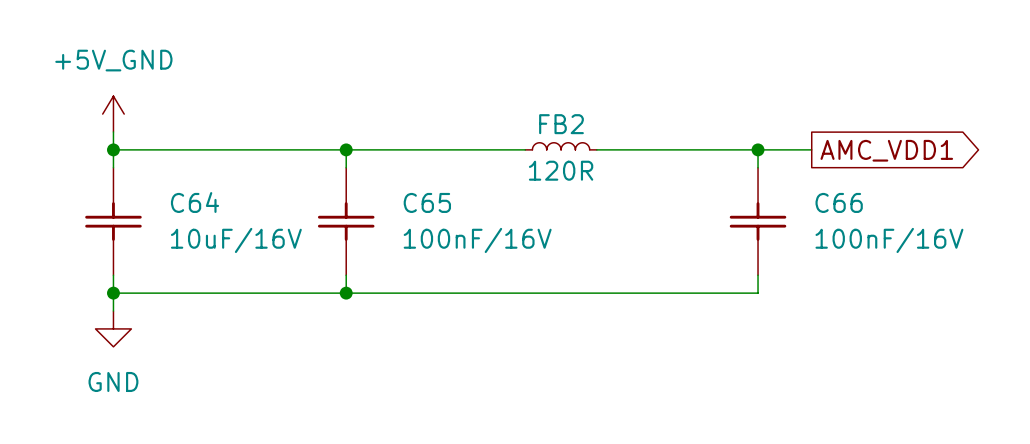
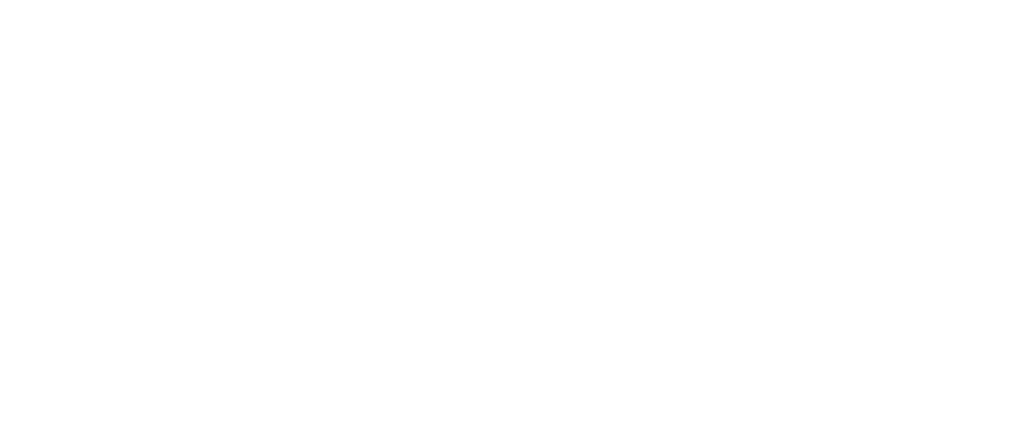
power symbol: +5V_GND (113, 114) -> none
wire: (113, 131) (113, 167) -> none
FB2: 120R (561, 146) -> none
wire: (113, 149) (525, 149) -> none
junction: (113, 149) -> none
wire: (346, 149) (346, 167) -> none
junction: (346, 149) -> none
wire: (596, 149) (811, 149) -> none
wire: (758, 149) (758, 167) -> none
junction: (758, 149) -> none
global label: AMC_VDD1 (886, 150) -> none
C64: 10uF/16V (113, 221) -> none
C65: 100nF/16V (346, 221) -> none
C66: 100nF/16V (758, 221) -> none
wire: (113, 275) (113, 311) -> none
wire: (346, 275) (346, 293) -> none
wire: (758, 275) (758, 293) (113, 293) -> none
junction: (113, 293) -> none
junction: (346, 293) -> none
power symbol: GND (113, 328) -> none

